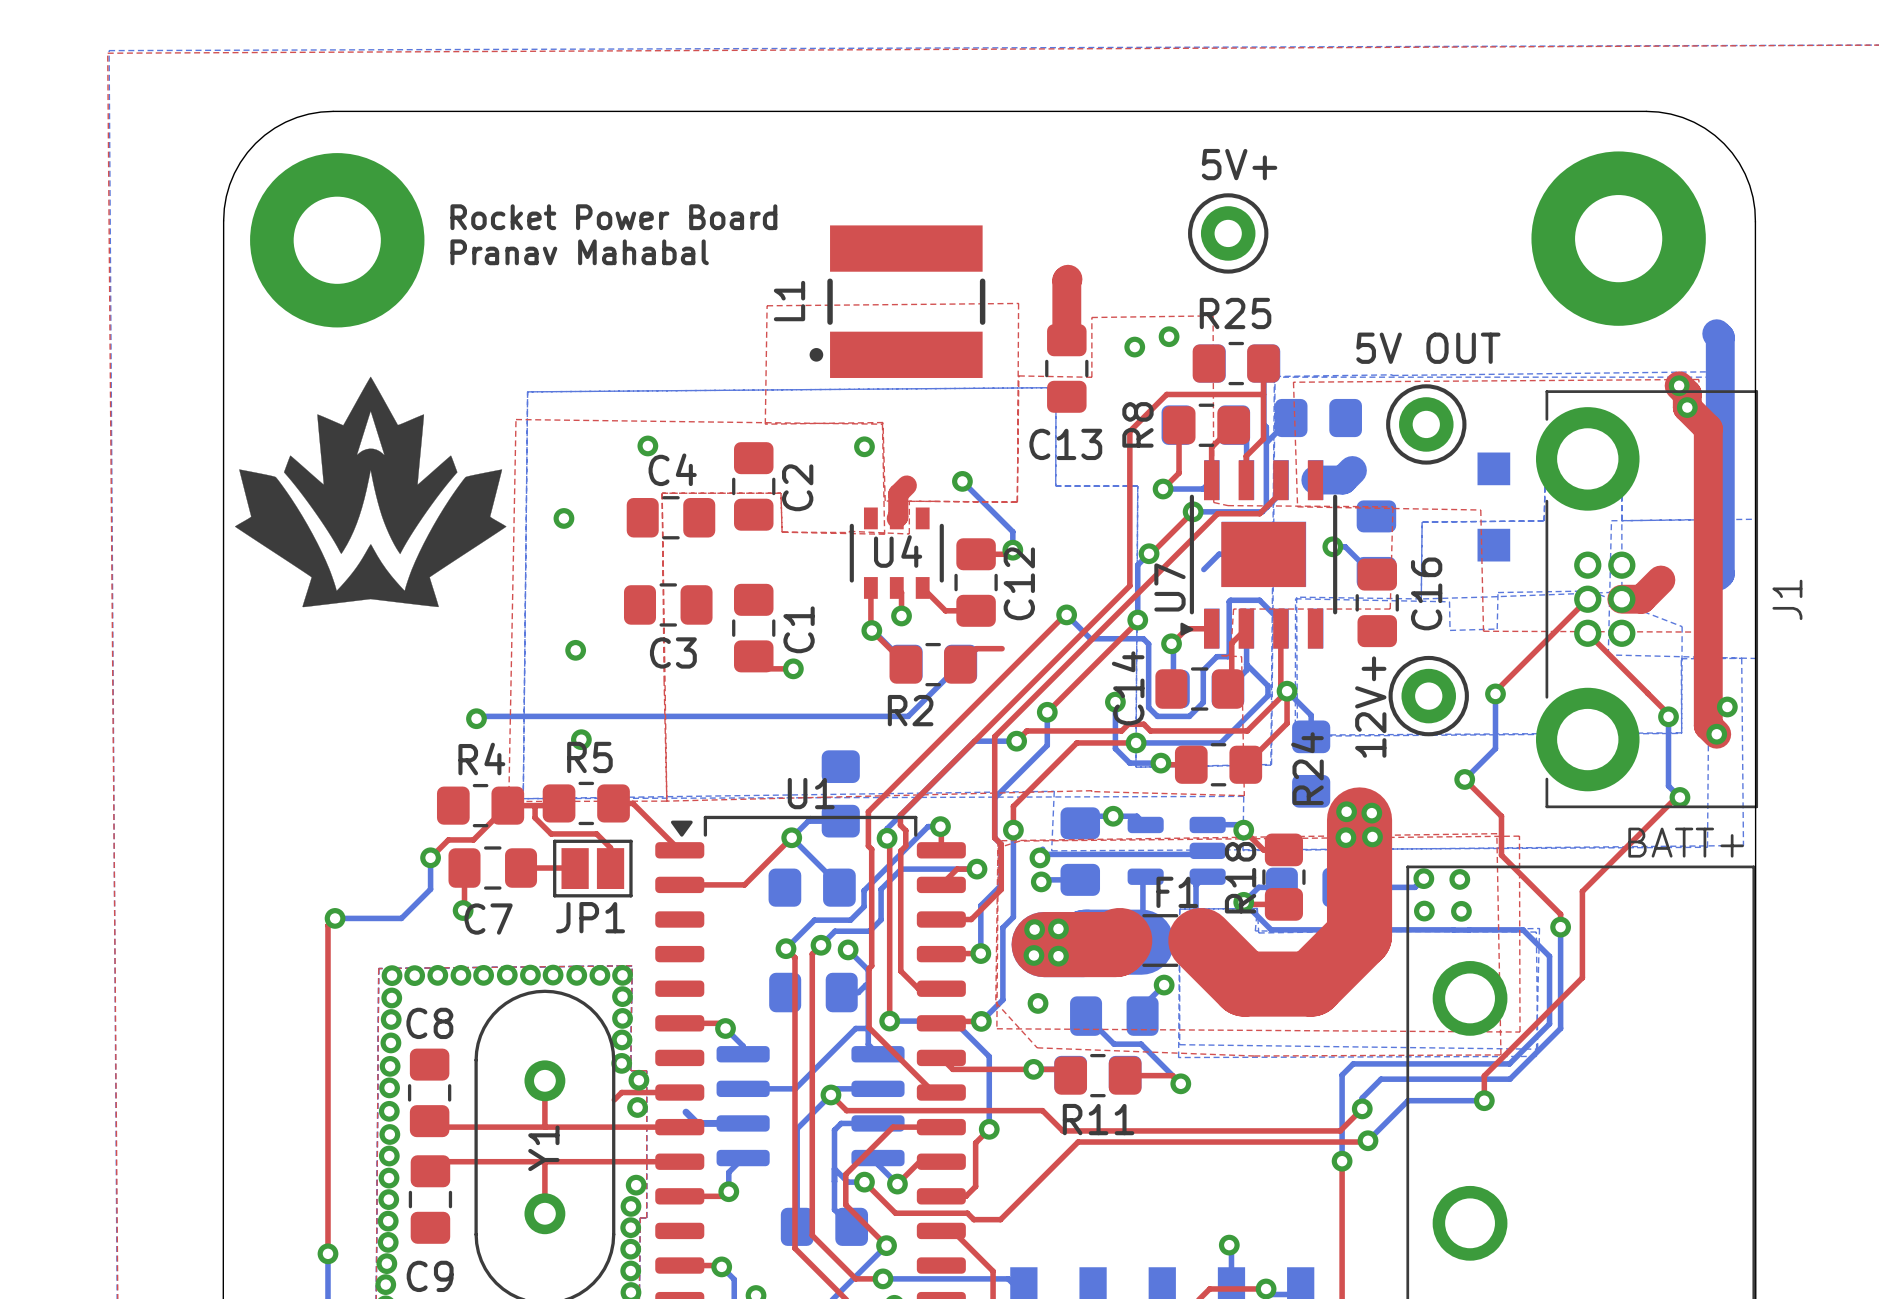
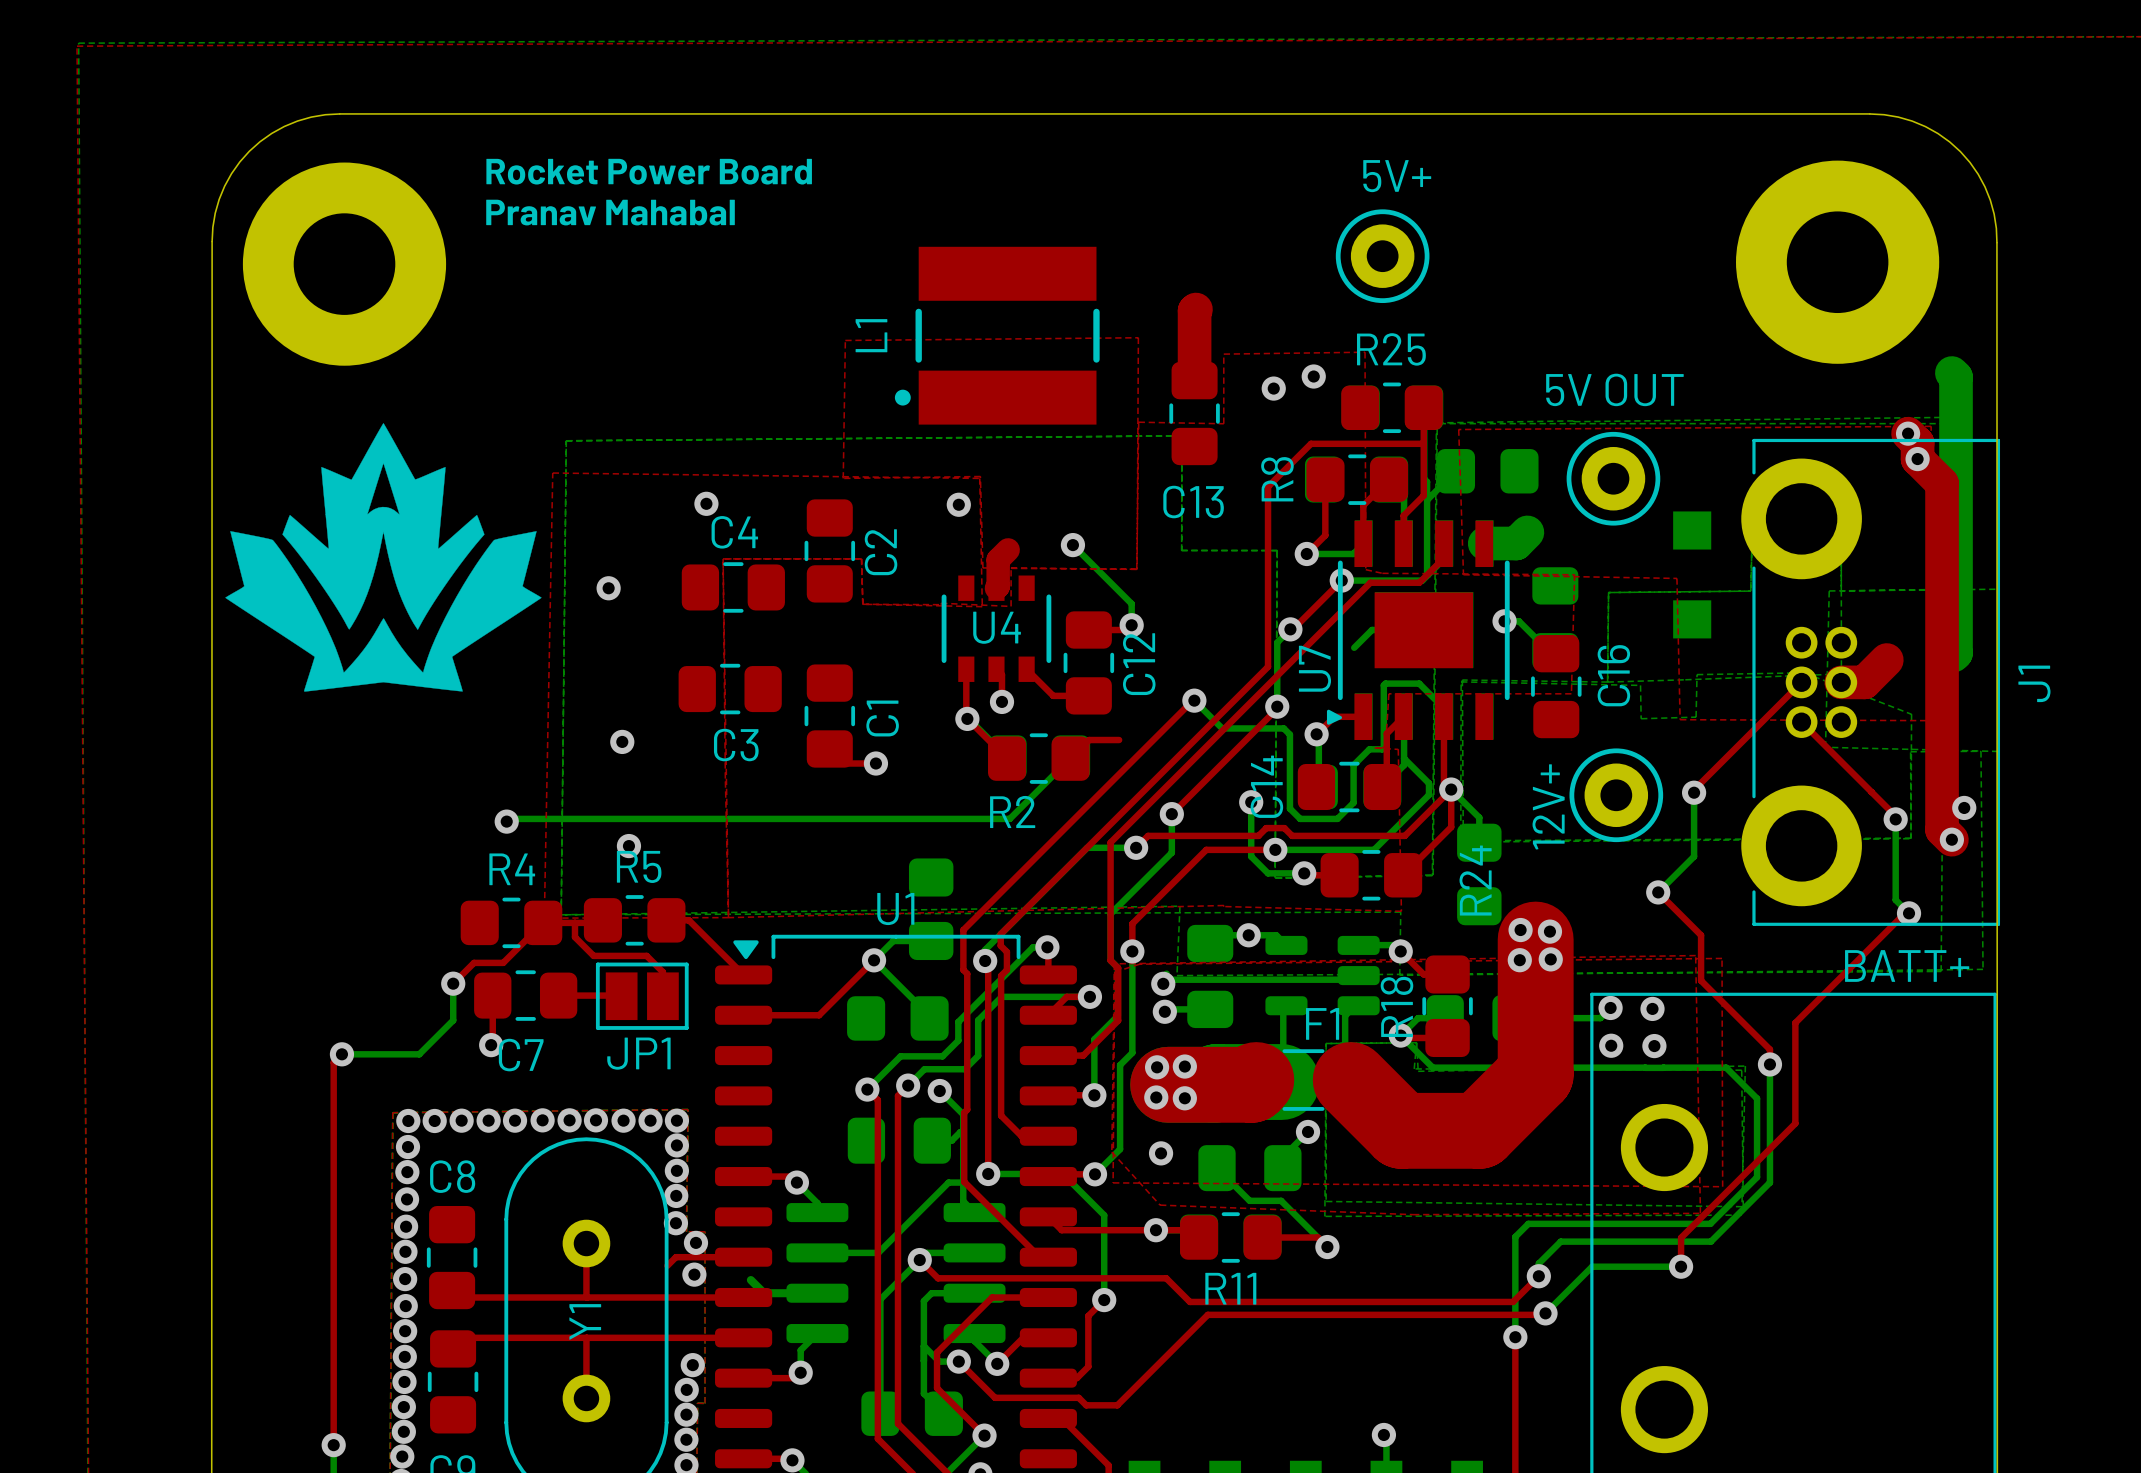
text: none -> Rocket Power Board (649, 171)
text: Rocket Power Board (613, 217) -> Pranav Mahabal (610, 212)
text: Pranav Mahabal (579, 252) -> none

